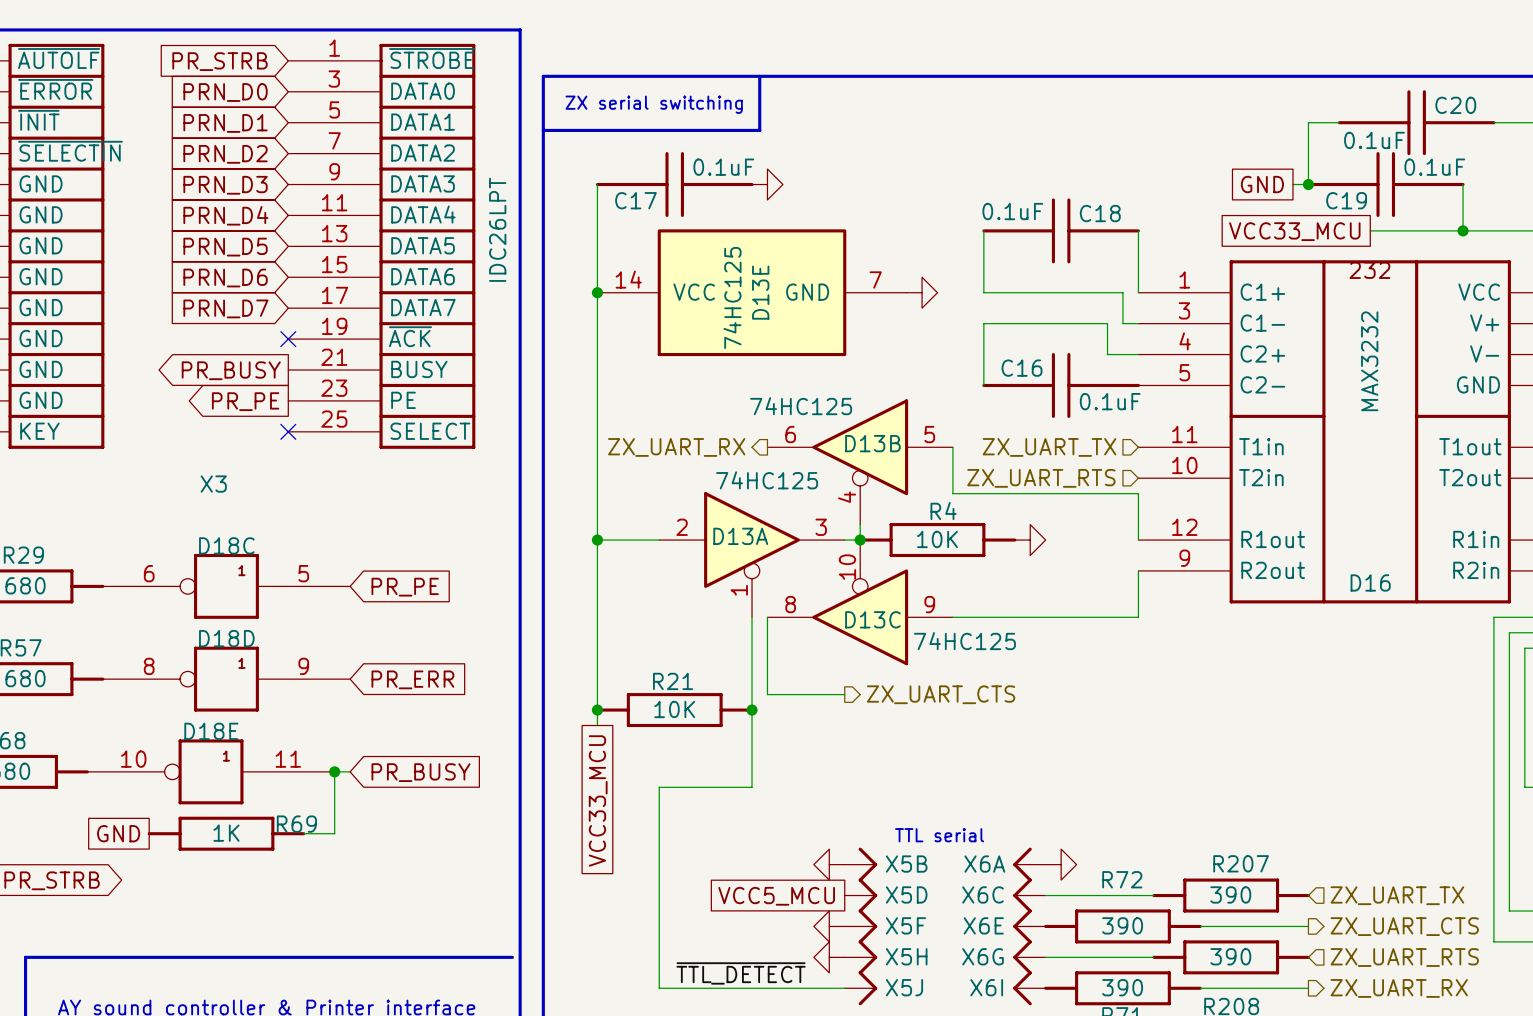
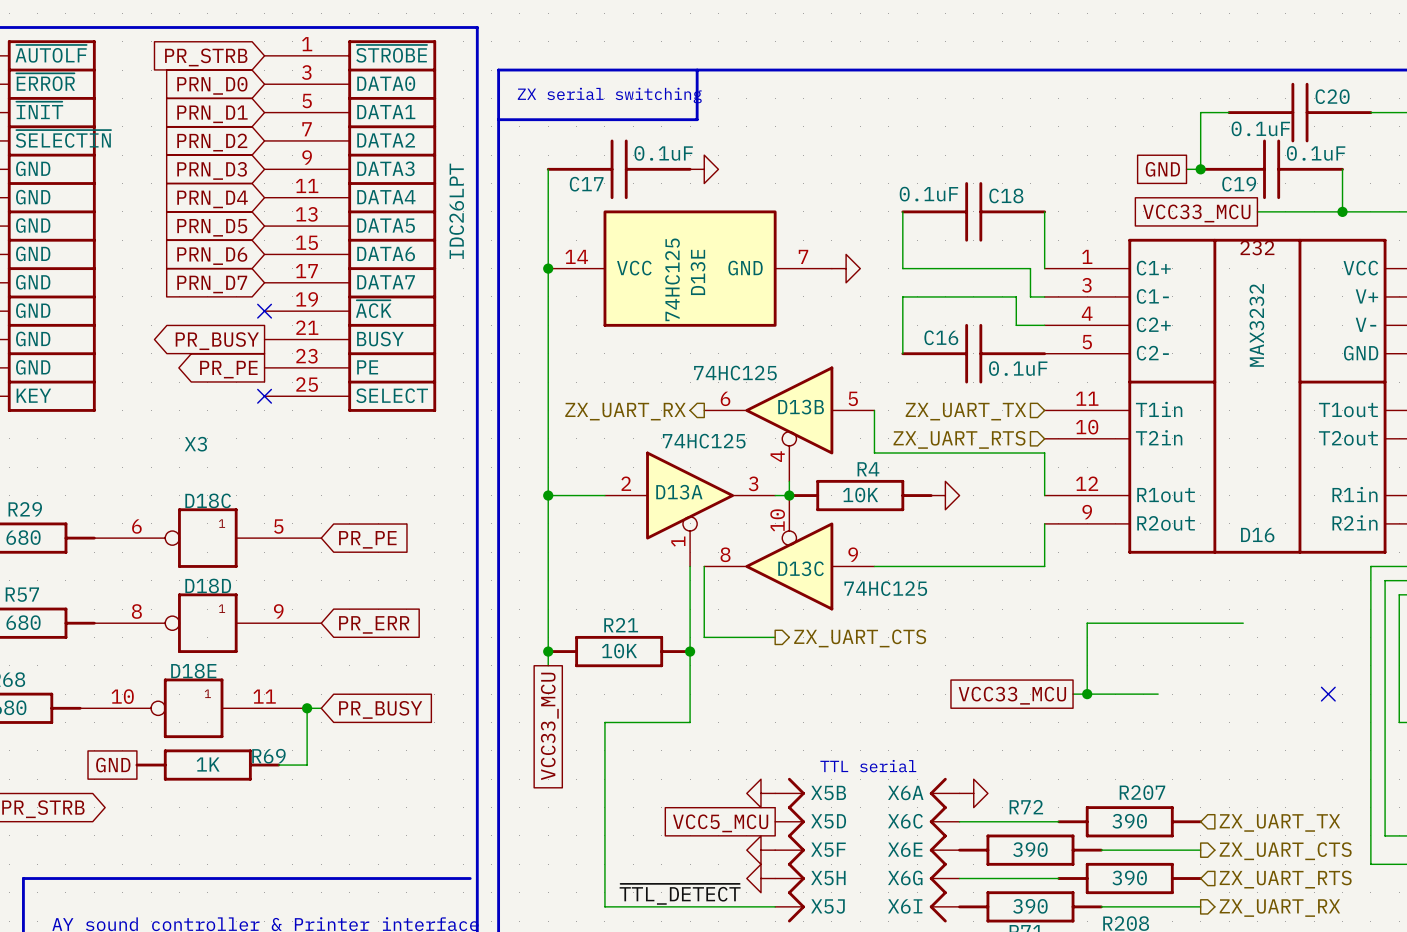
wire: none -> (1243, 623) (1087, 623) (1087, 694)
wire: none -> (1073, 694) (1158, 694)
junction: none -> (1087, 694)
no-connect mark: none -> (1328, 694)
global label: none -> VCC33_MCU (1012, 695)

